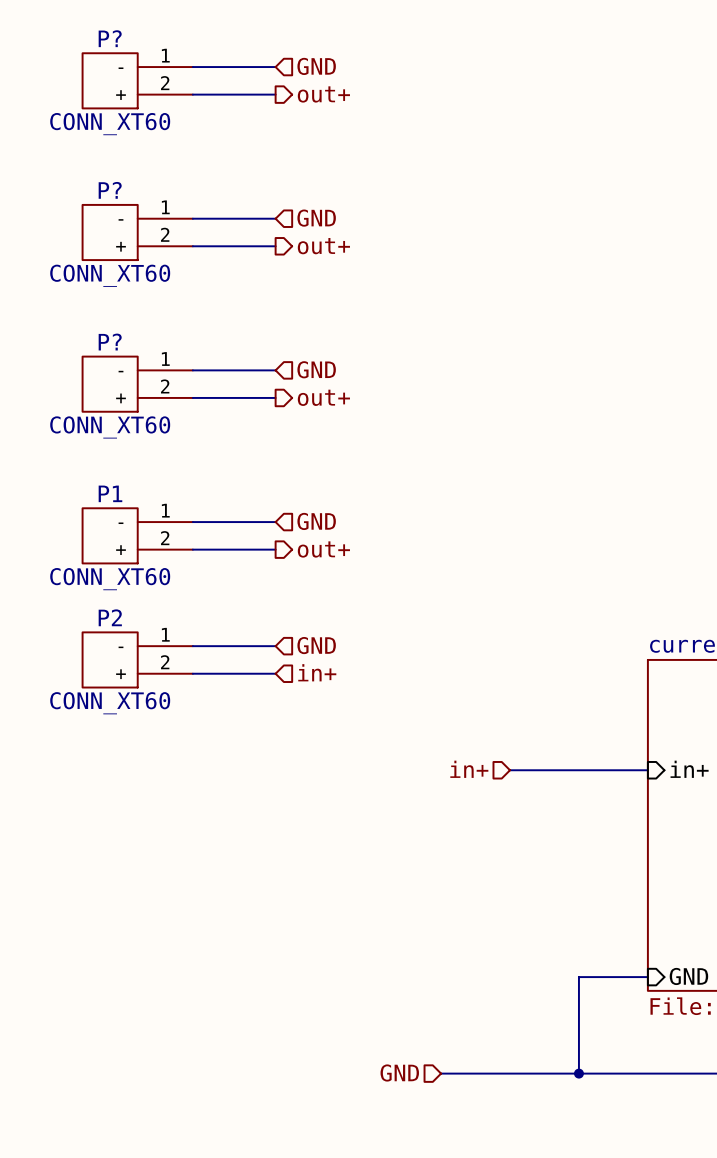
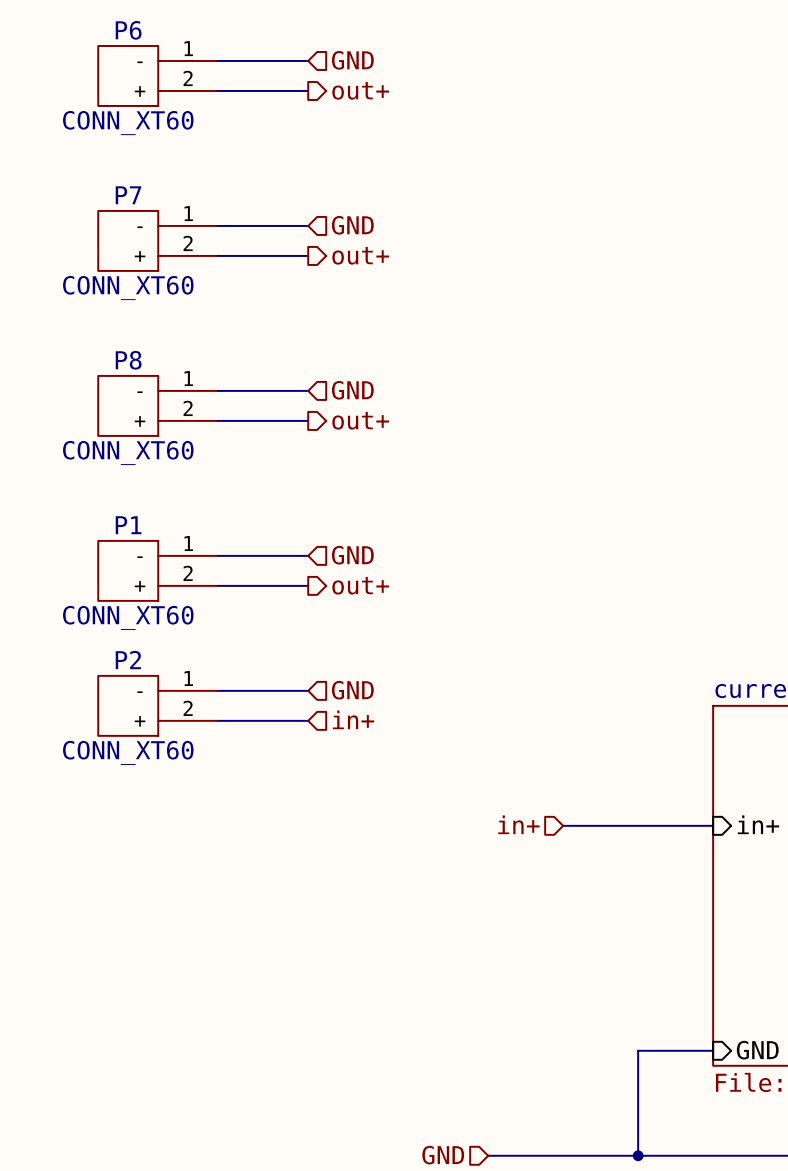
P? name: P? (110, 38) -> P6 (128, 30)
P? name: P? (110, 190) -> P7 (128, 195)
P? name: P? (110, 342) -> P8 (128, 360)

